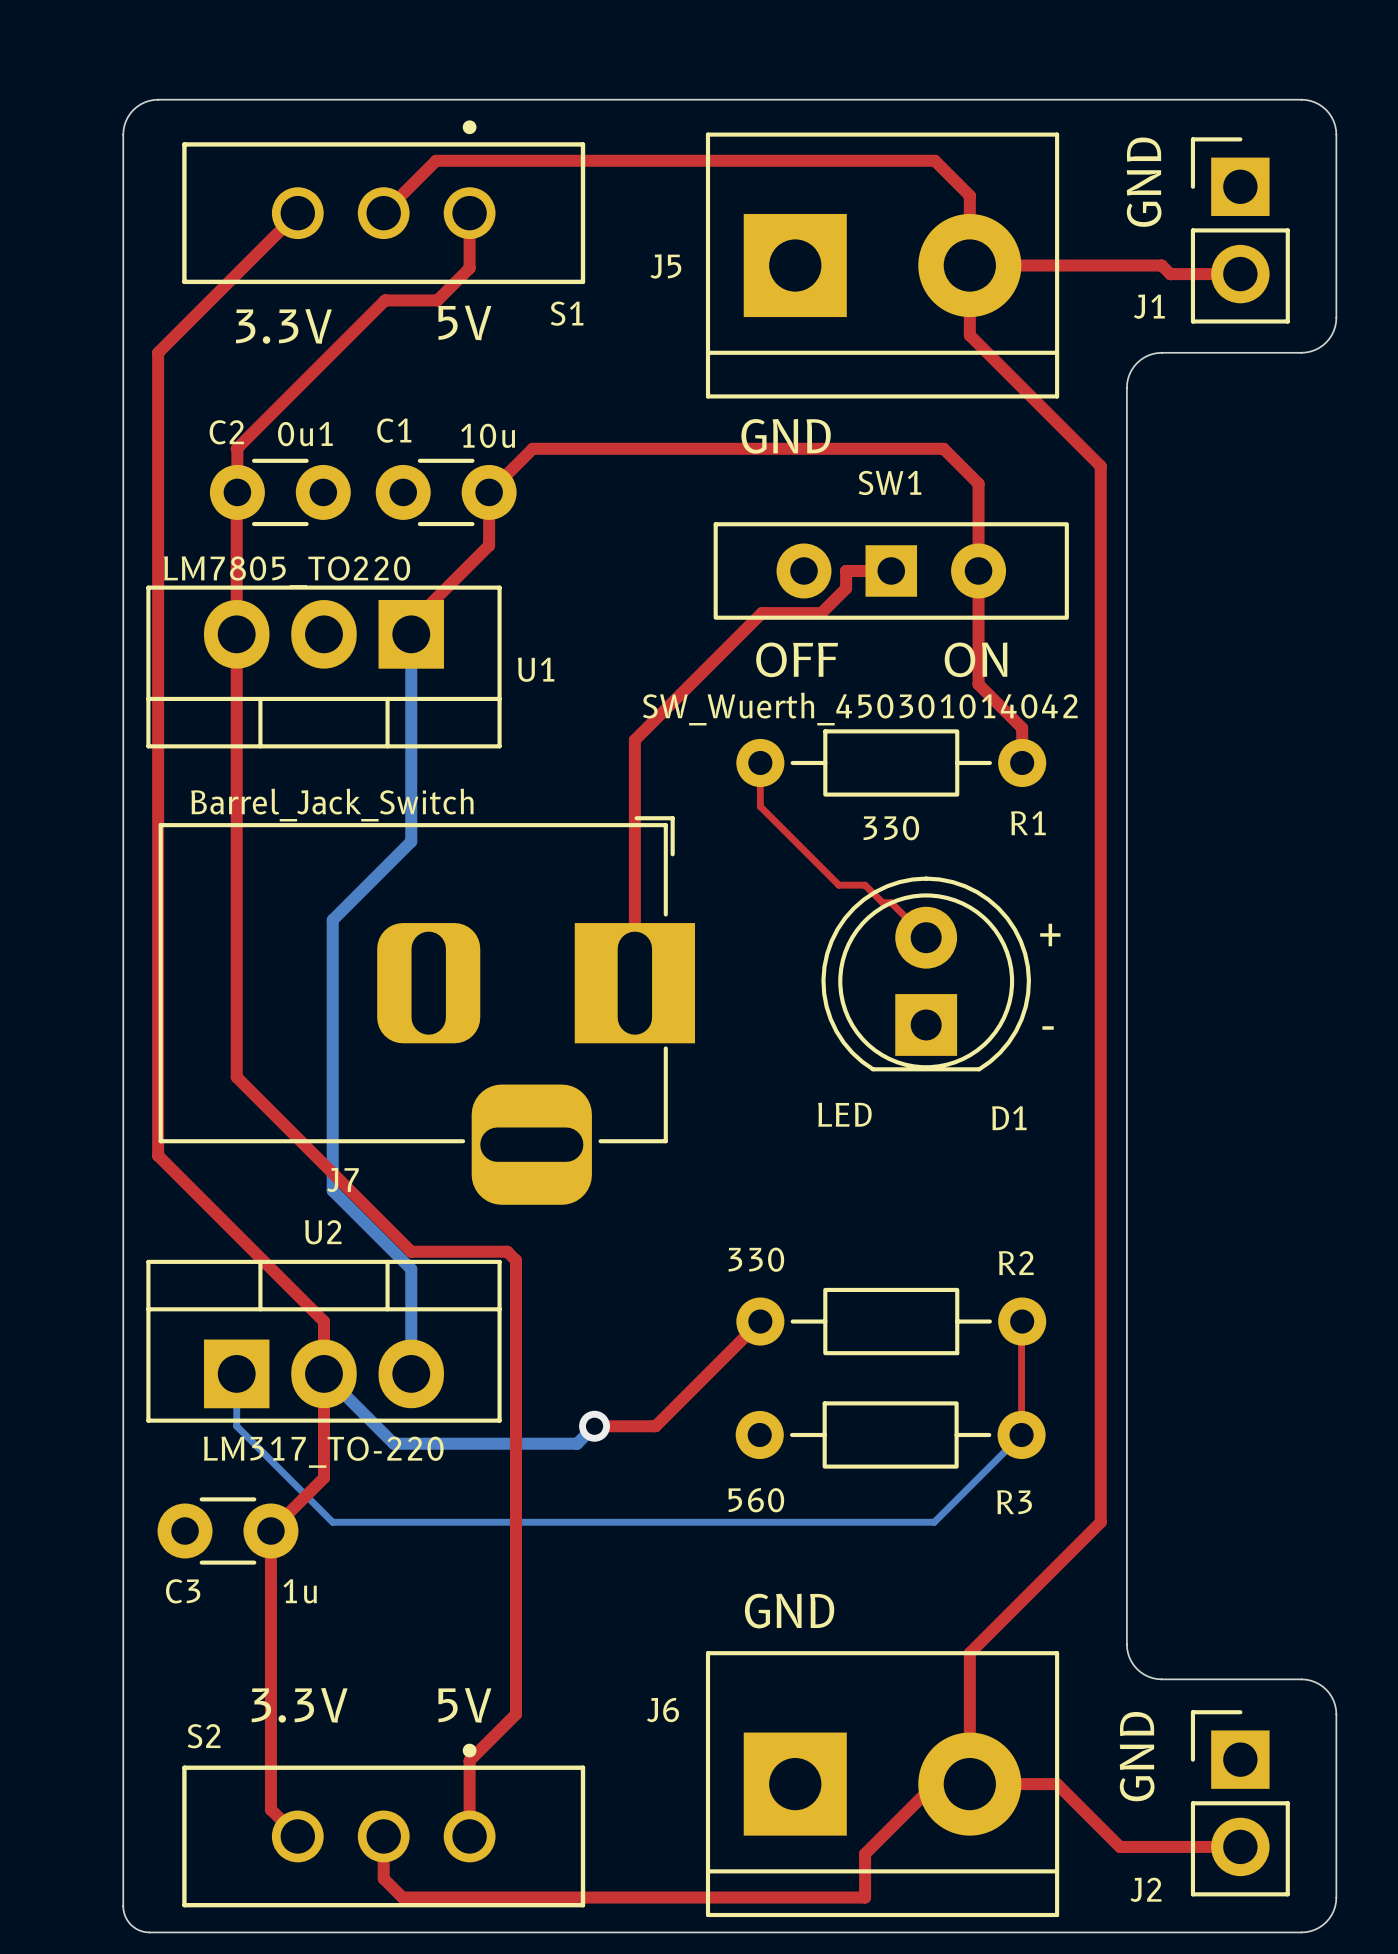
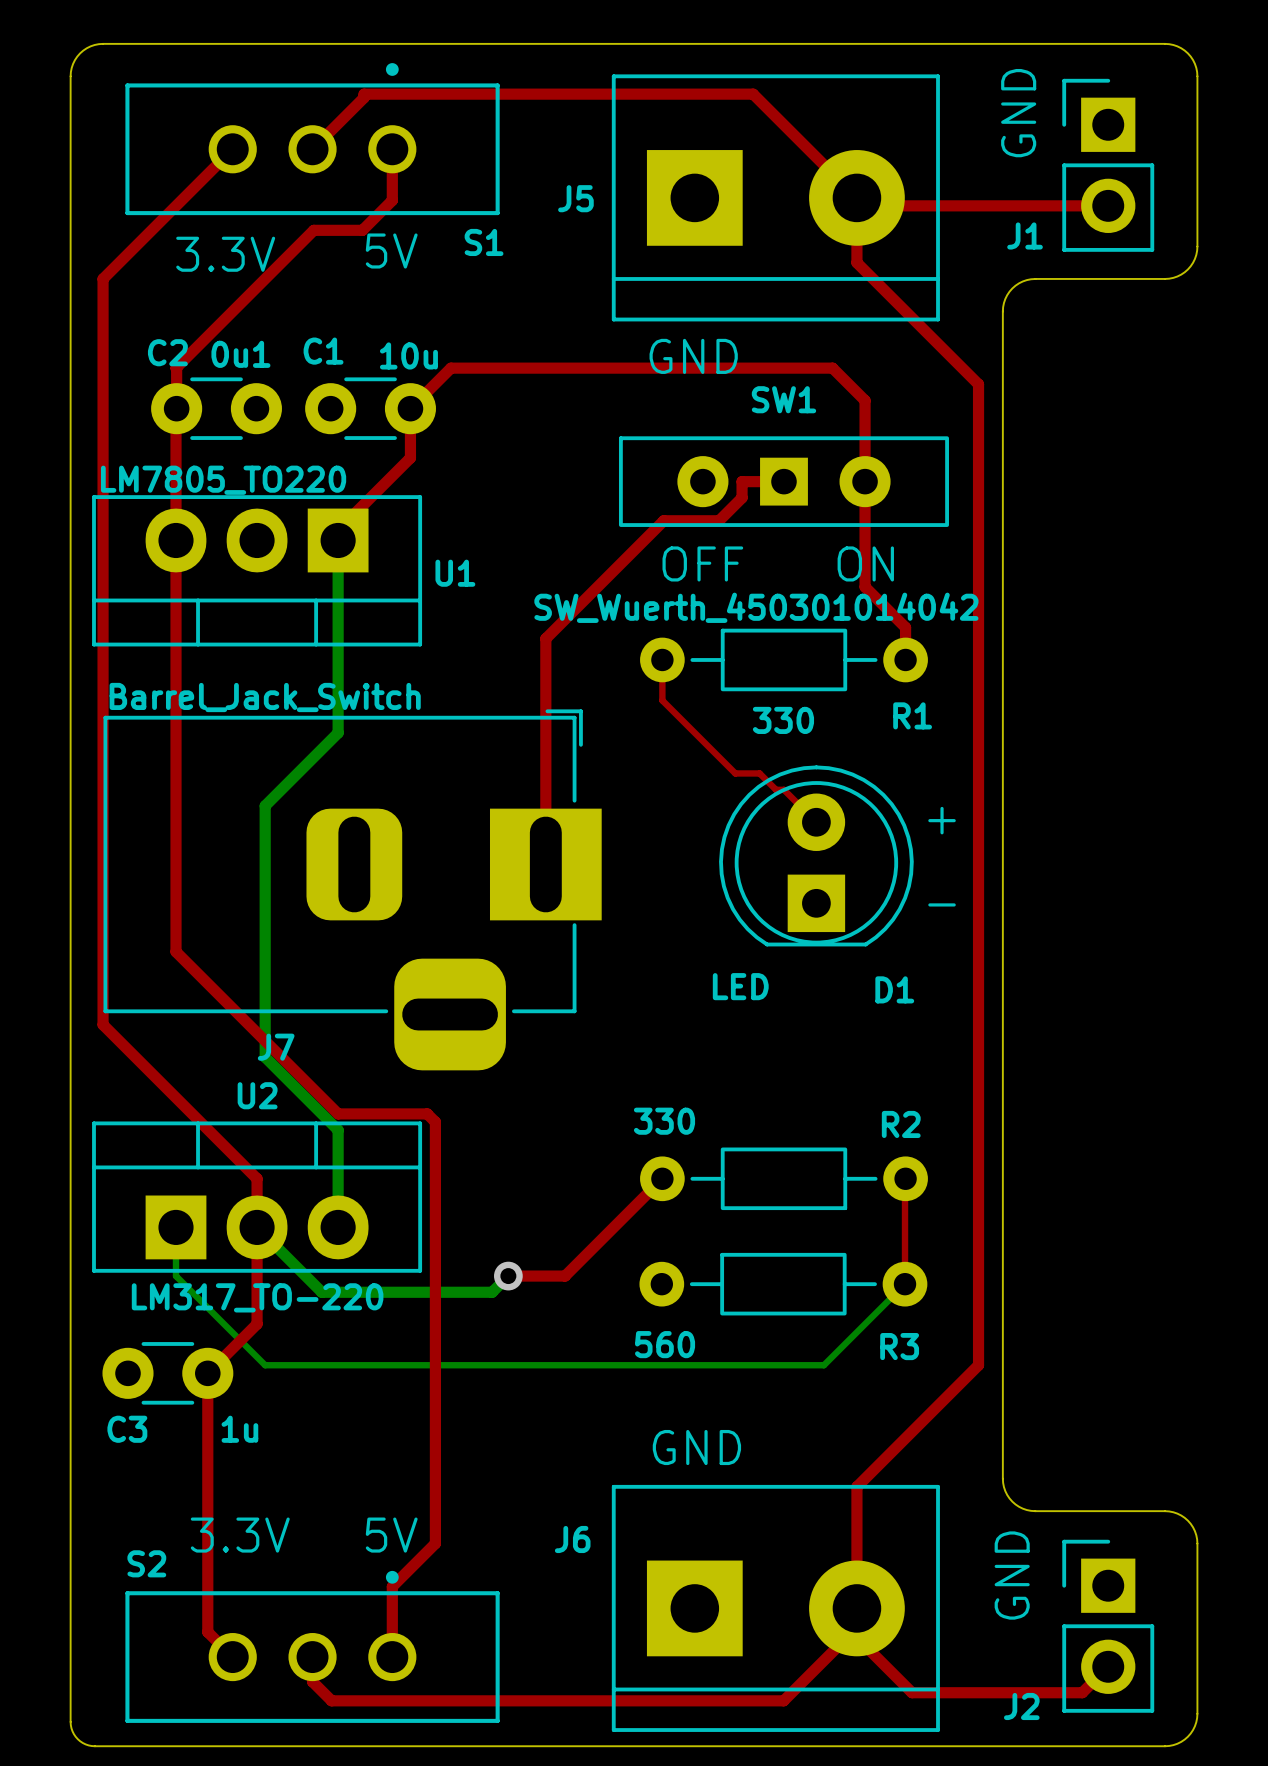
top track: (436, 160) (934, 160) (969, 195) (969, 265) (1161, 265) (1170, 274) -> (361, 100) (364, 94) (753, 94) (843, 184)
top track: none -> (876, 197) (884, 205) (1043, 205)
top track: (934, 1784) (865, 1853) (865, 1897) (402, 1897) (383, 1878) (383, 1863) -> (1108, 1666) (1082, 1692) (912, 1692) (856, 1637) (856, 1627) (783, 1700) (331, 1700) (312, 1681)
top track: (969, 1784) (1057, 1784) (1119, 1846) (1240, 1846) -> none

